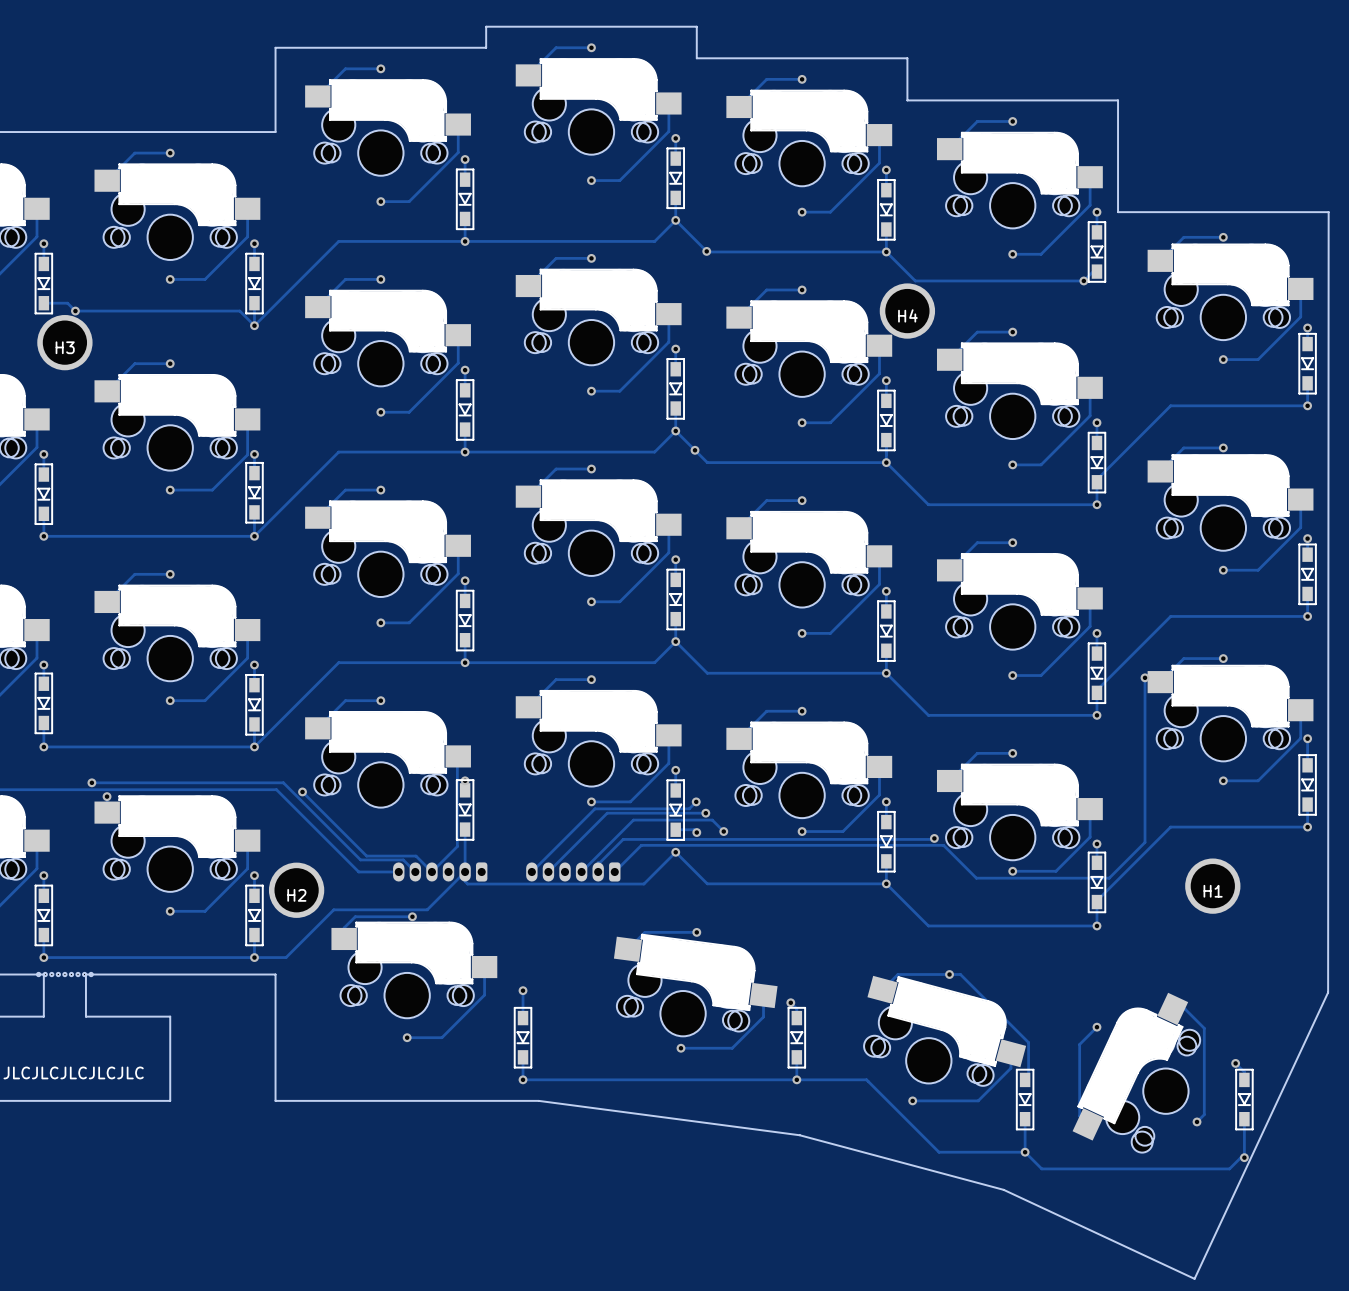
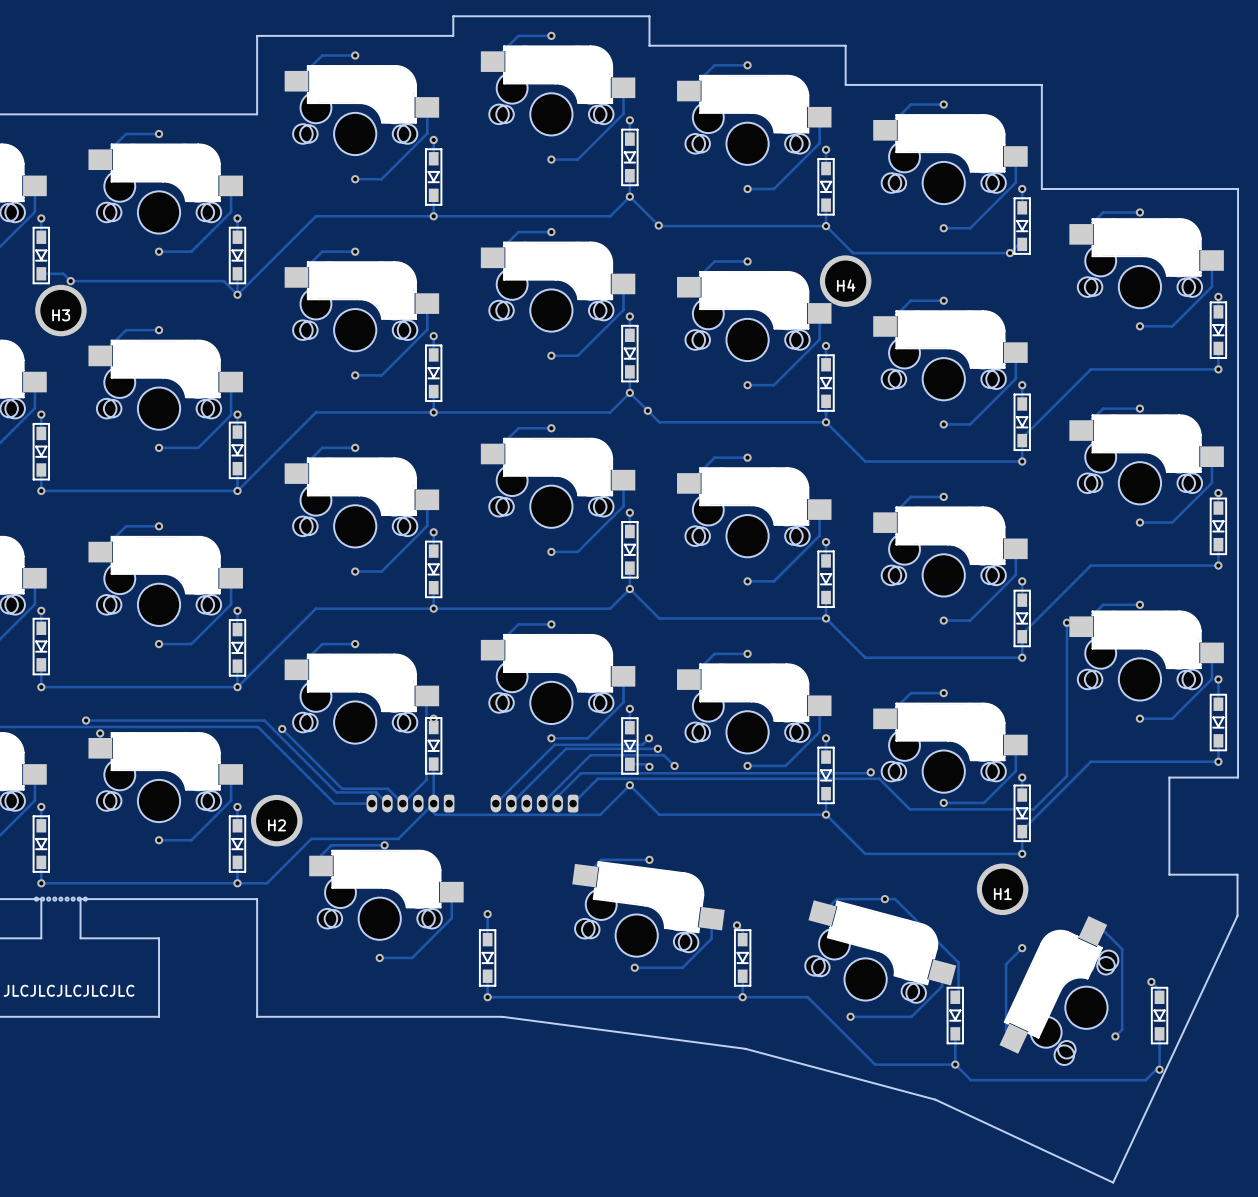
board edge: (1328, 212) (1328, 992) -> (1238, 189) (1238, 777) (1169, 777) (1169, 874) (1237, 874) (1237, 915)
H1 position: (1212, 886) -> (1002, 889)

